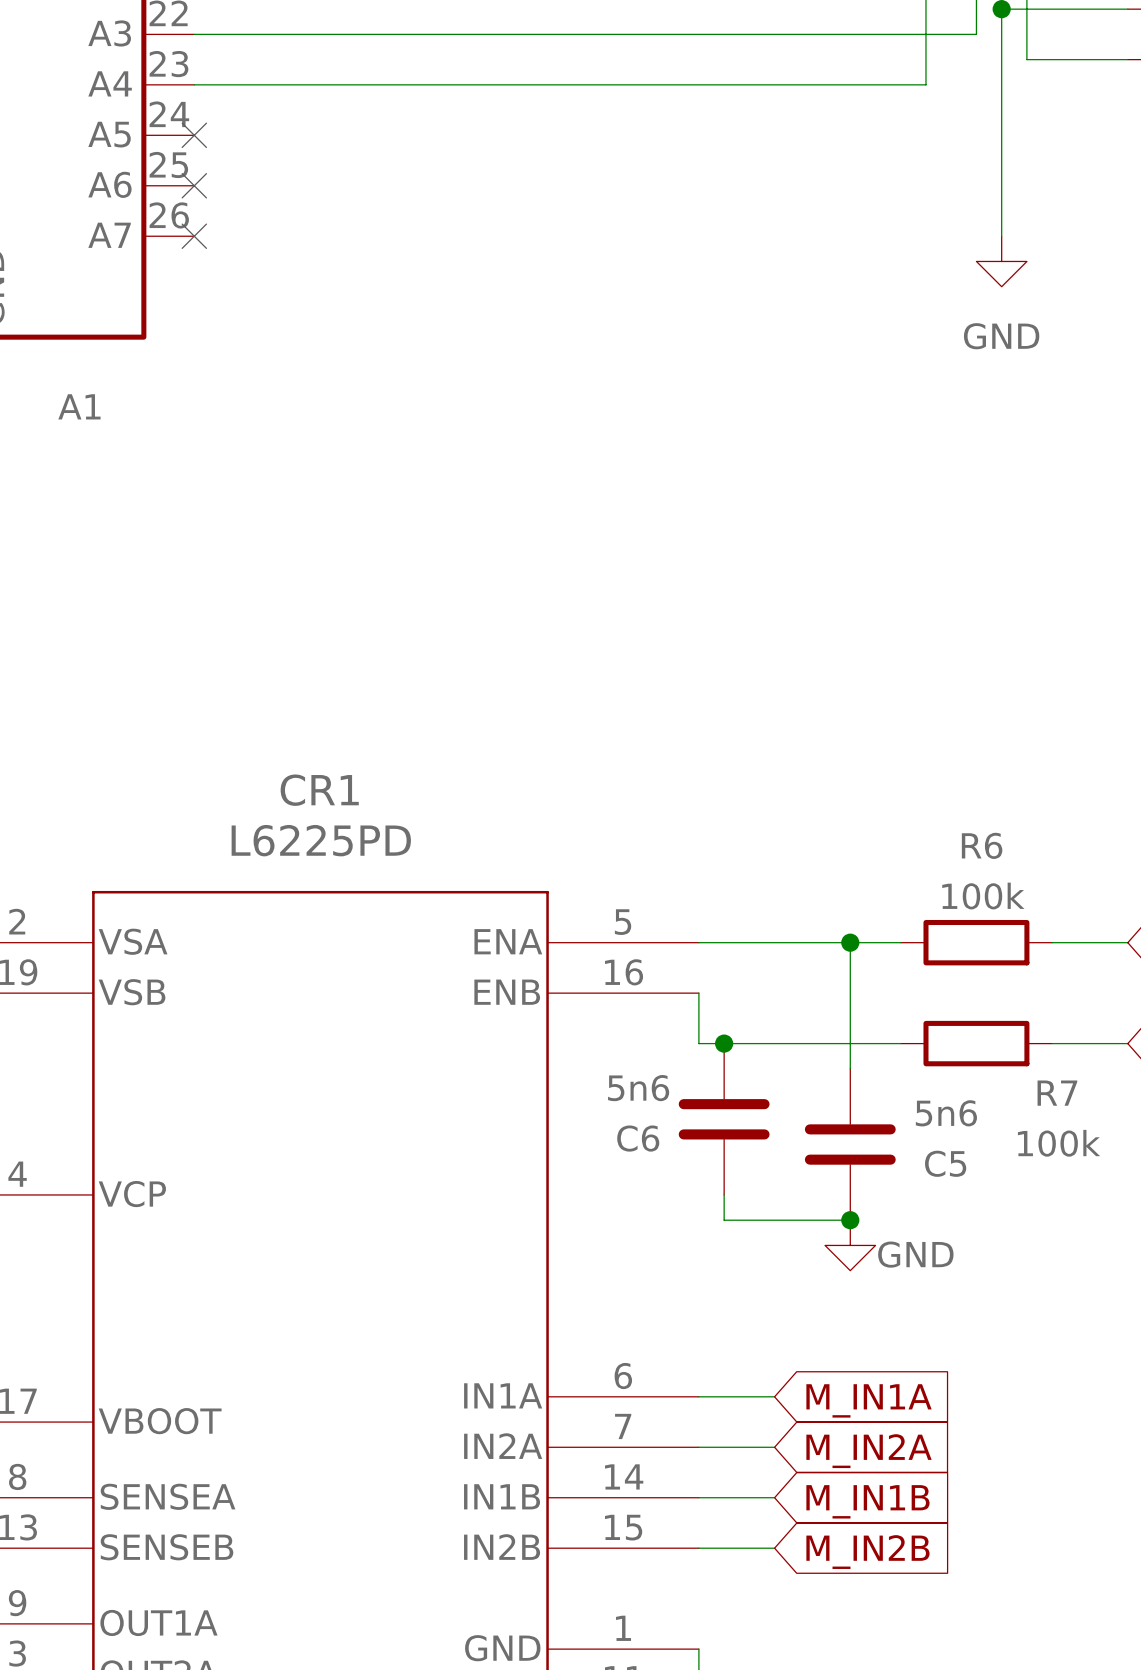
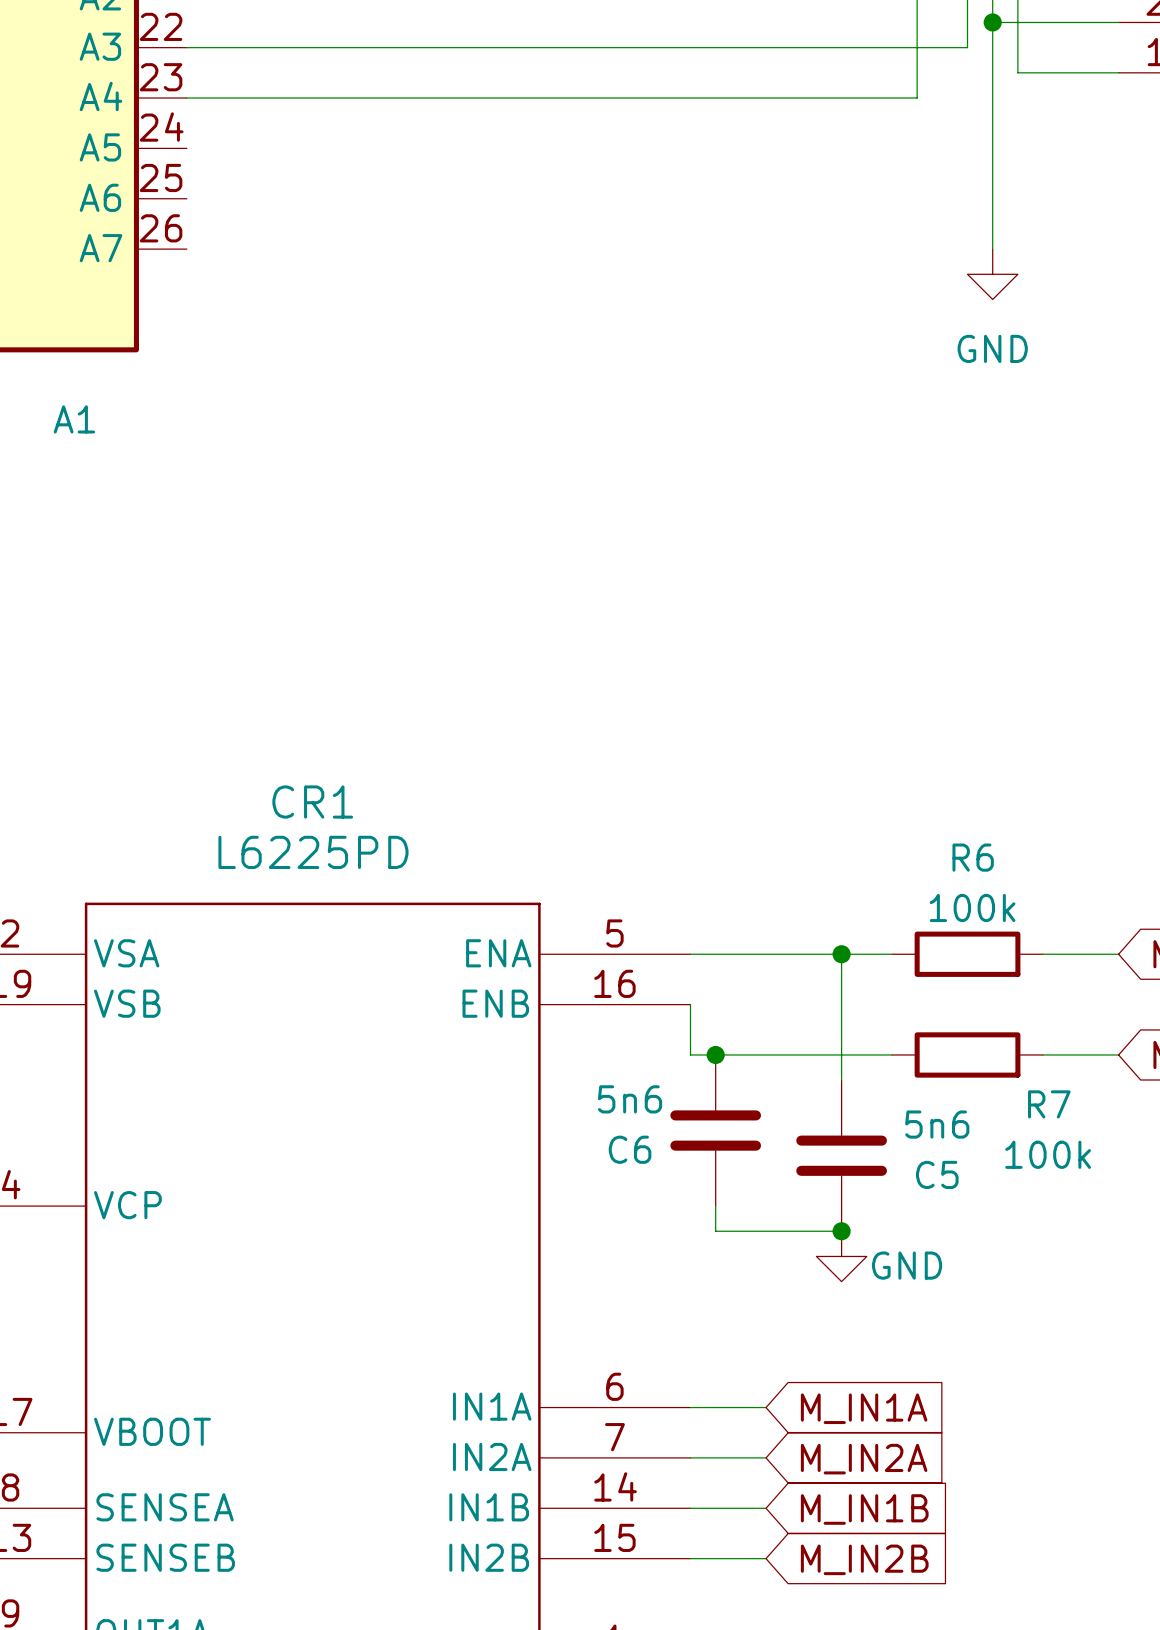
no-connect mark: (194, 135) -> none
no-connect mark: (194, 185) -> none
no-connect mark: (194, 236) -> none

